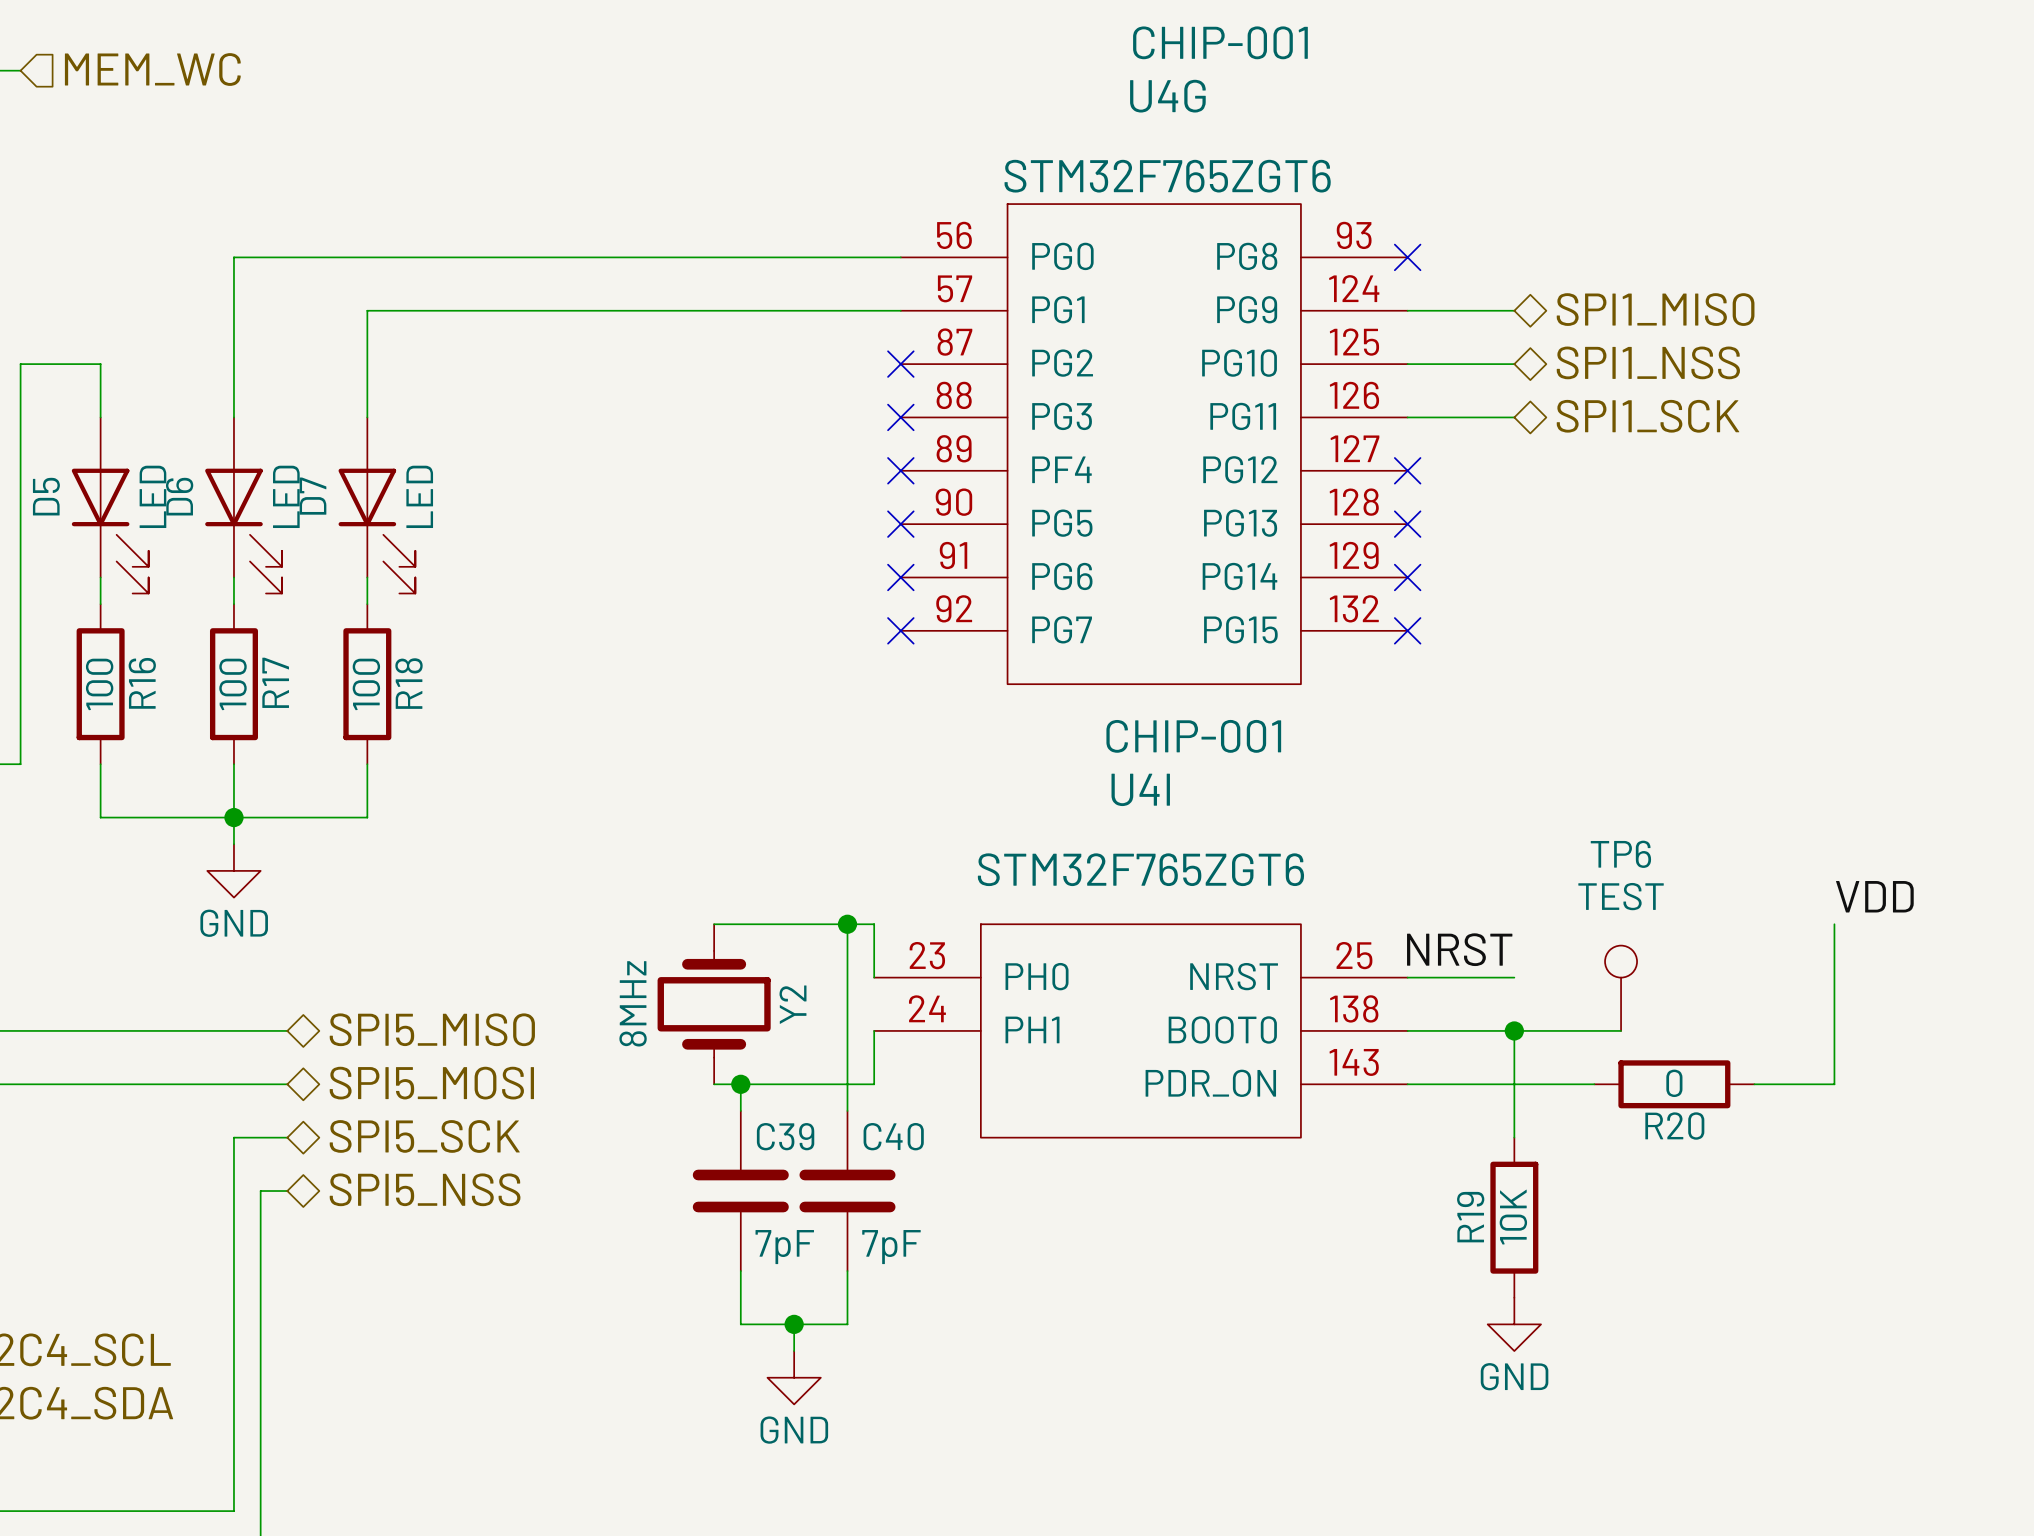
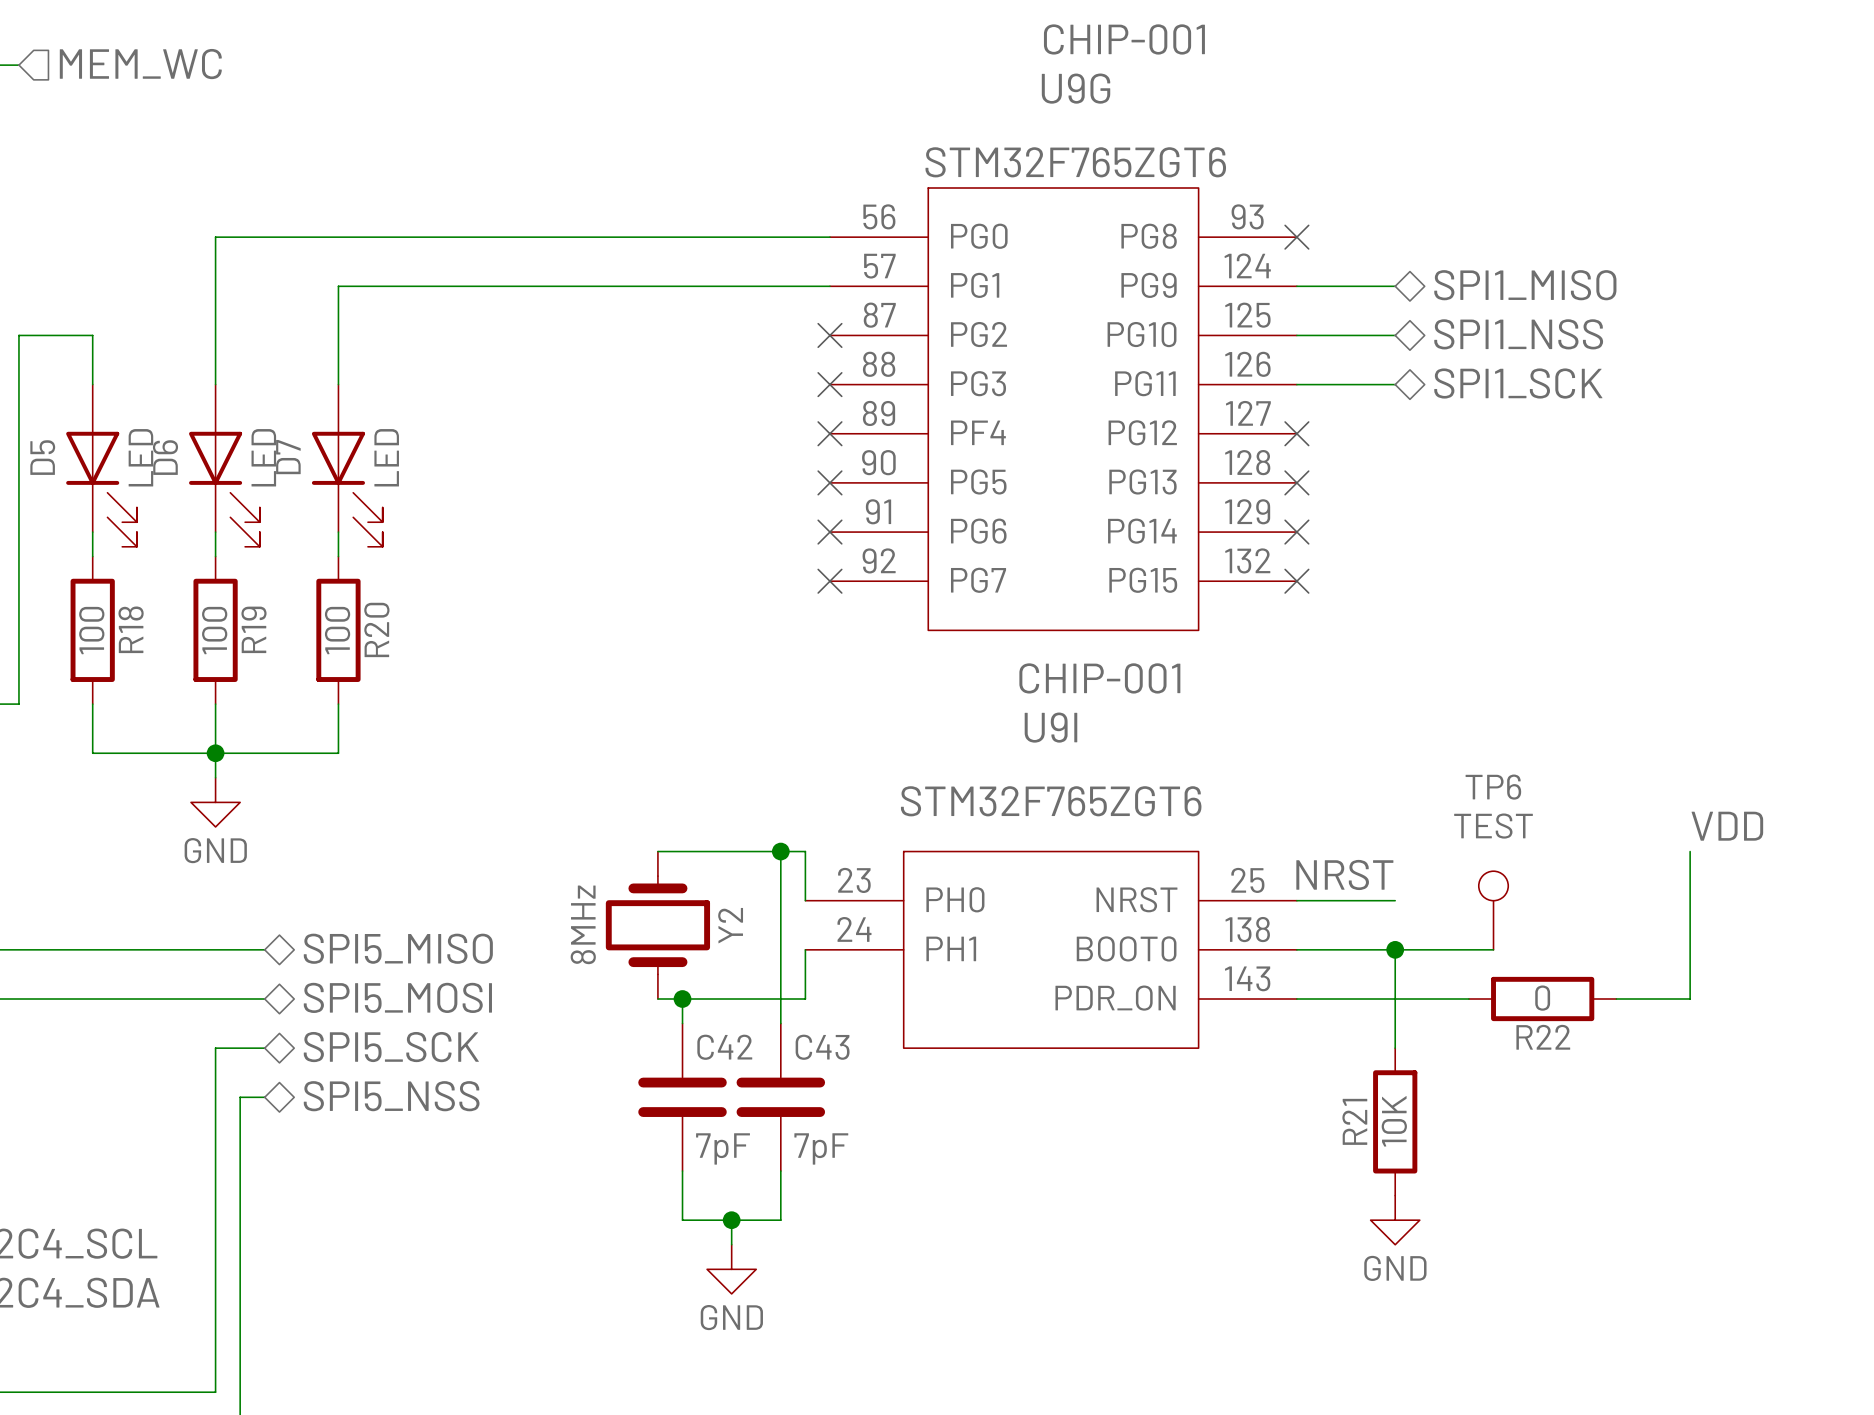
U4G name: U4G (1167, 96) -> U9G (1076, 88)
R17 name: R17 (275, 682) -> R19 (253, 629)
R16 name: R16 (142, 683) -> R18 (131, 629)
R18 name: R18 (409, 683) -> R20 (376, 629)
U4I name: U4I (1140, 789) -> U9I (1050, 727)
R20 name: R20 (1674, 1126) -> R22 (1543, 1037)
C39 name: C39 (785, 1136) -> C42 (724, 1047)
C40 name: C40 (893, 1136) -> C43 (822, 1047)
R19 name: R19 (1470, 1217) -> R21 (1354, 1121)

